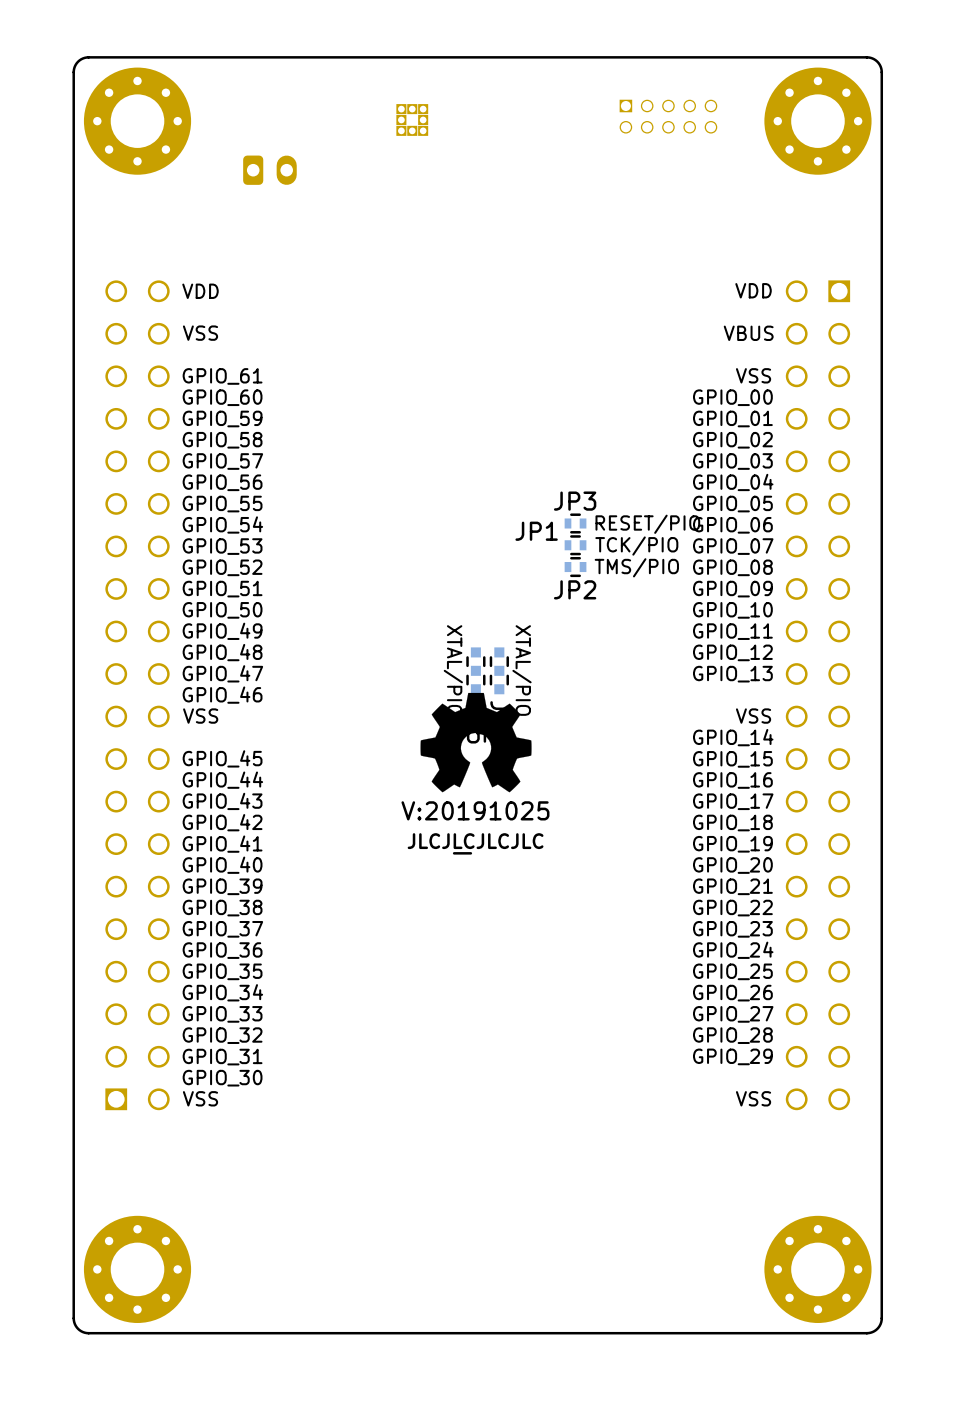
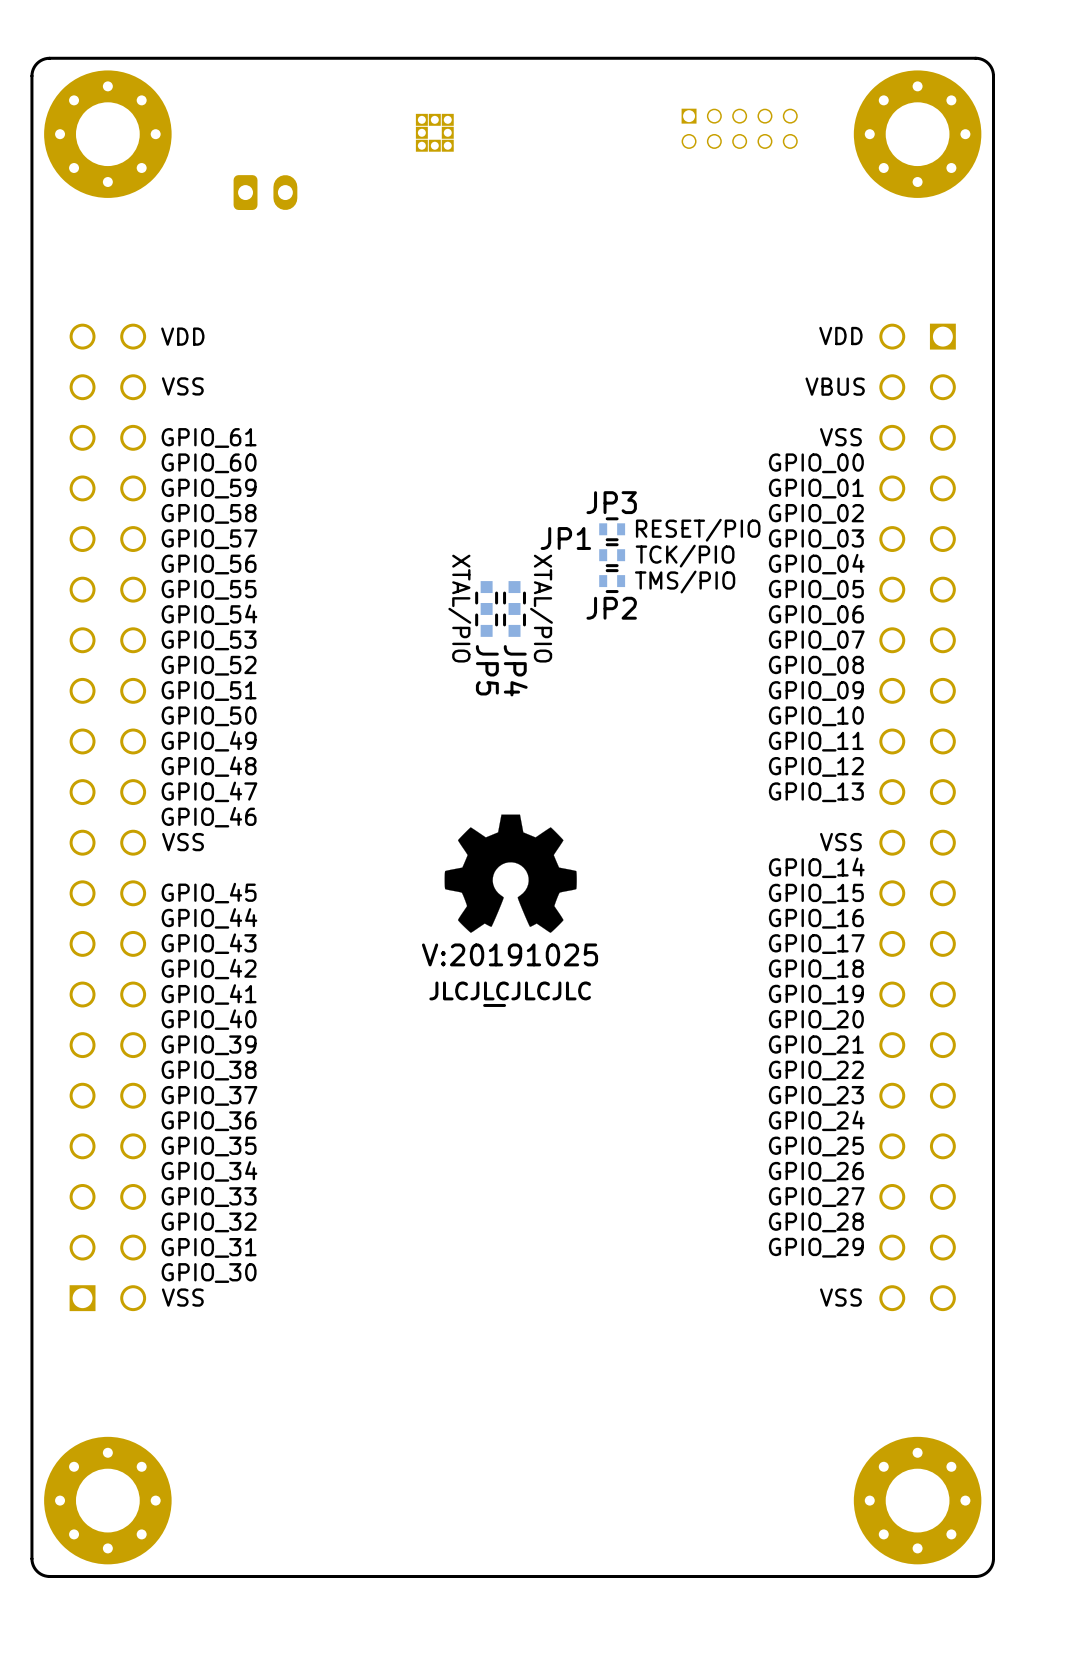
JP3 position: (575, 523) -> (612, 529)
JP1 position: (575, 545) -> (612, 555)
JP2 position: (575, 567) -> (612, 581)
JP5 position: (475, 670) -> (486, 608)
JP4 position: (499, 670) -> (514, 608)

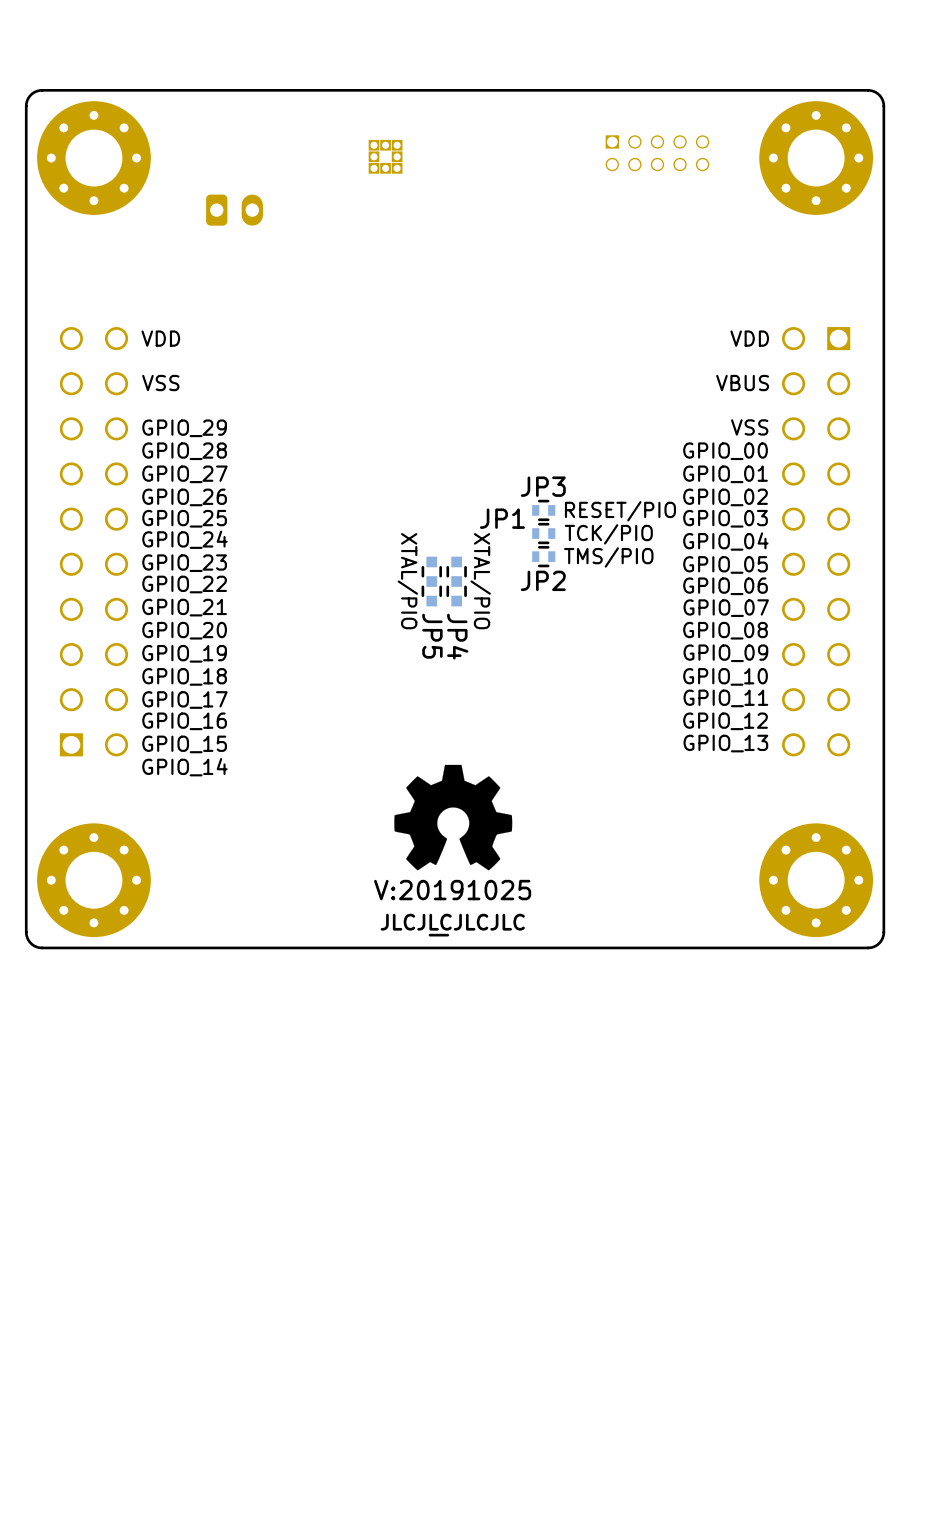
part: none -> (93, 541)
part: none -> (816, 541)
part: (107, 817) -> none
part: (917, 817) -> none
part: none -> (93, 880)
part: none -> (816, 880)
board edge: (993, 1002) (993, 1558) (991, 1567) (984, 1574) (975, 1576) (49, 1576) (37, 1571) (31, 1558) (31, 1002) -> (883, 932) (879, 943) (868, 947) (42, 947) (30, 943) (26, 932)
part: (107, 1500) -> none
part: (917, 1500) -> none

